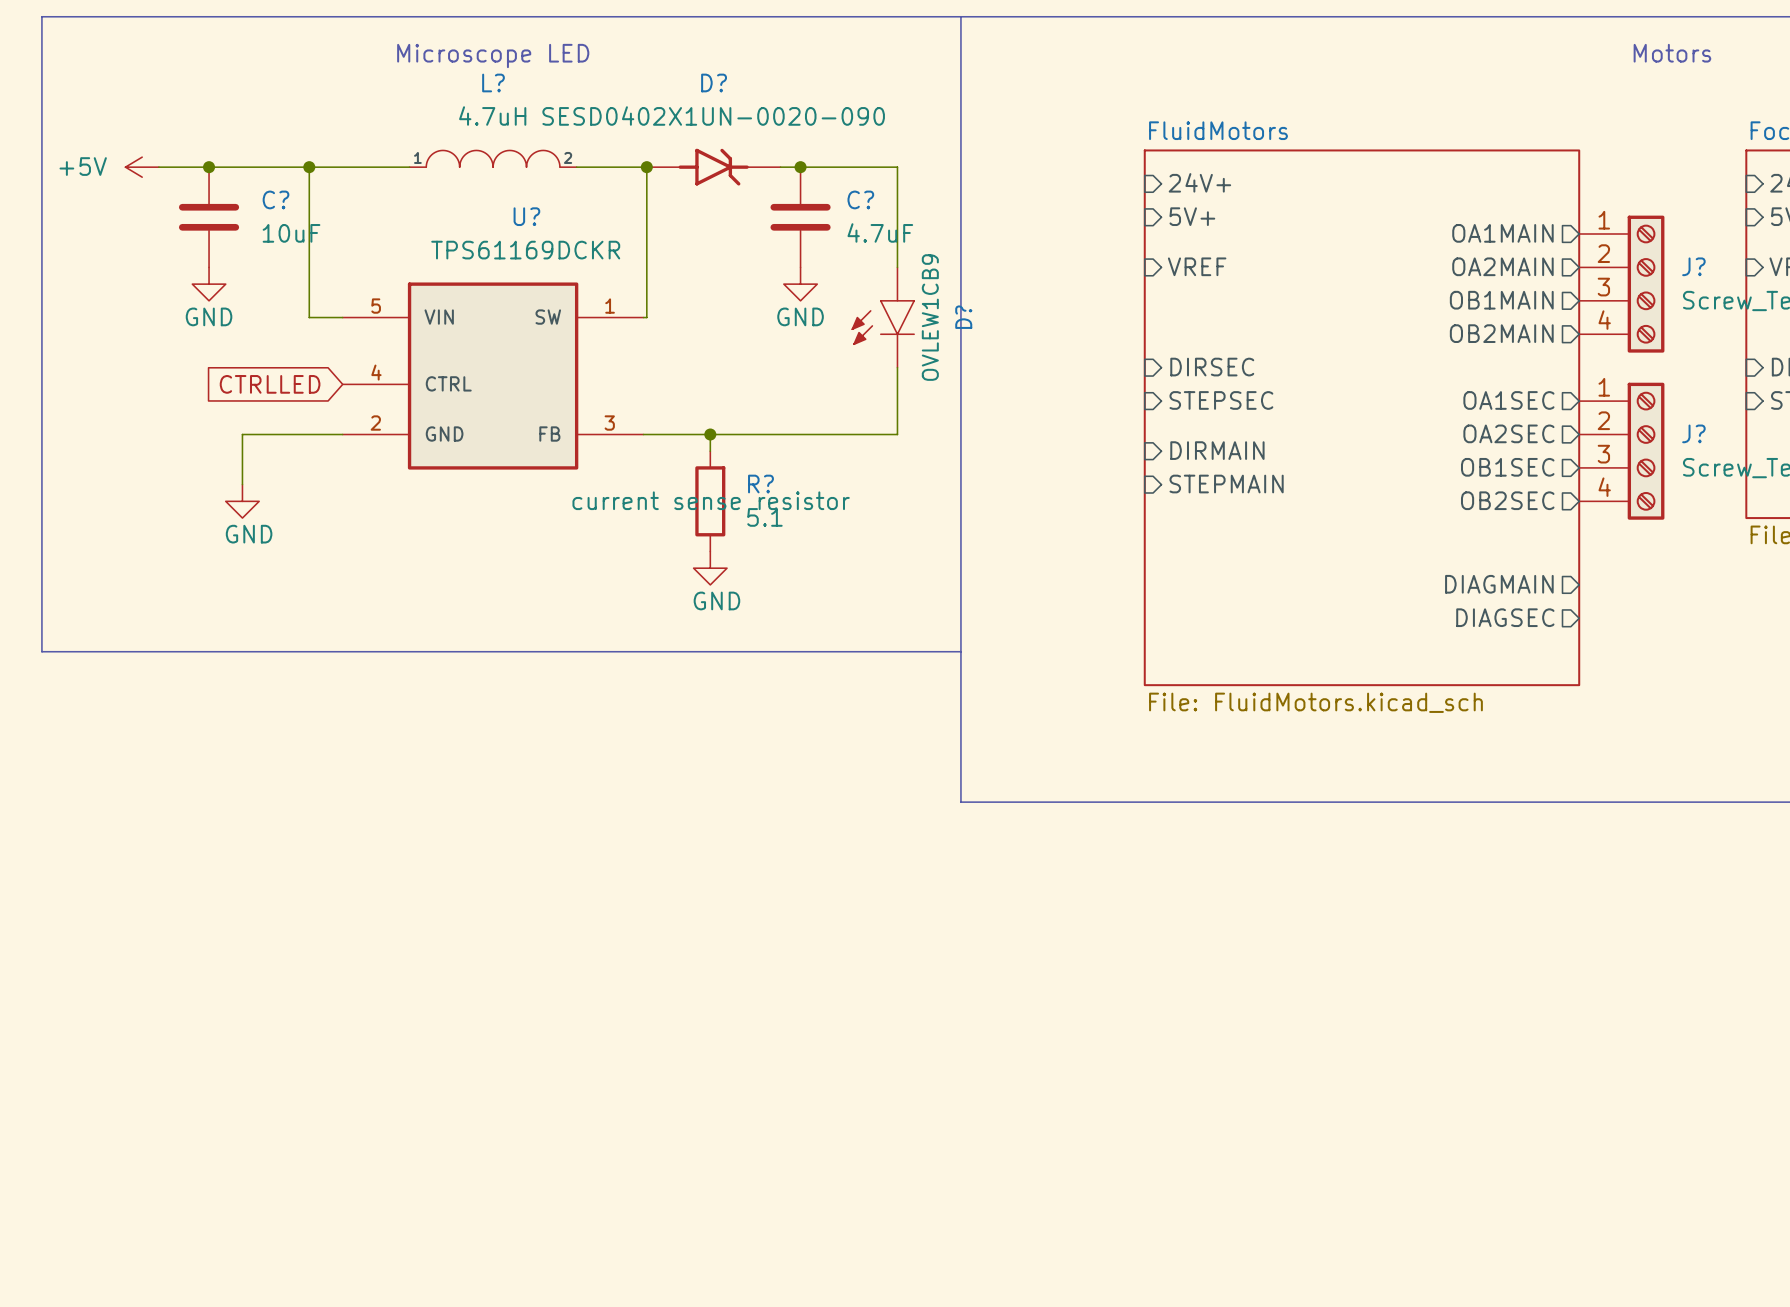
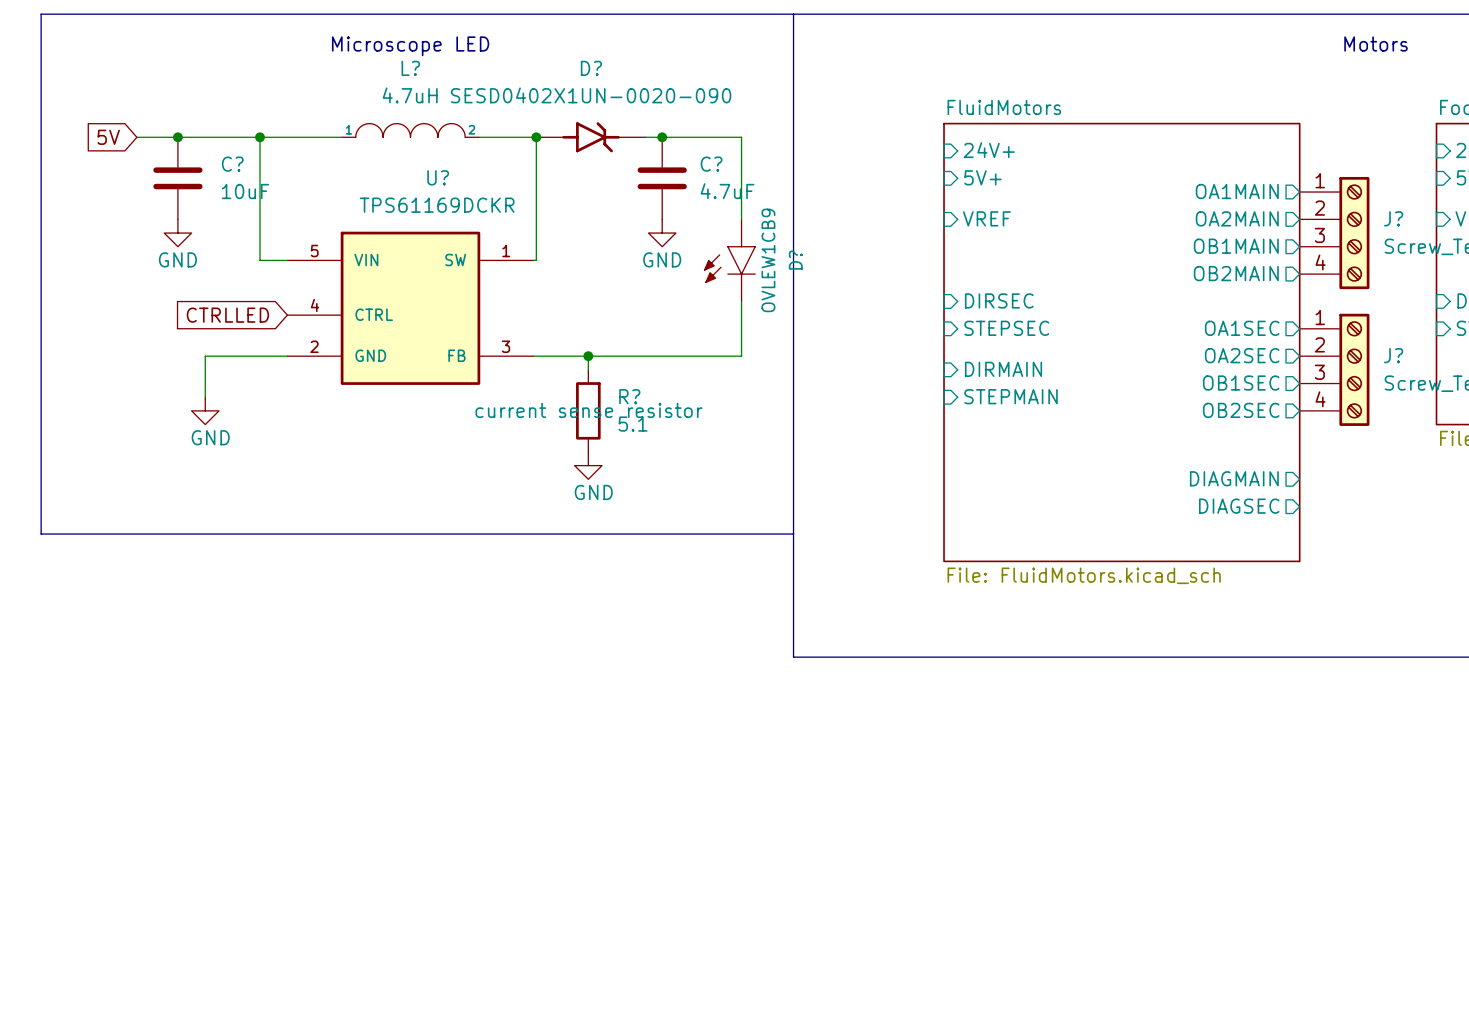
global label: none -> 5V (108, 137)
power symbol: +5V (142, 167) -> none

